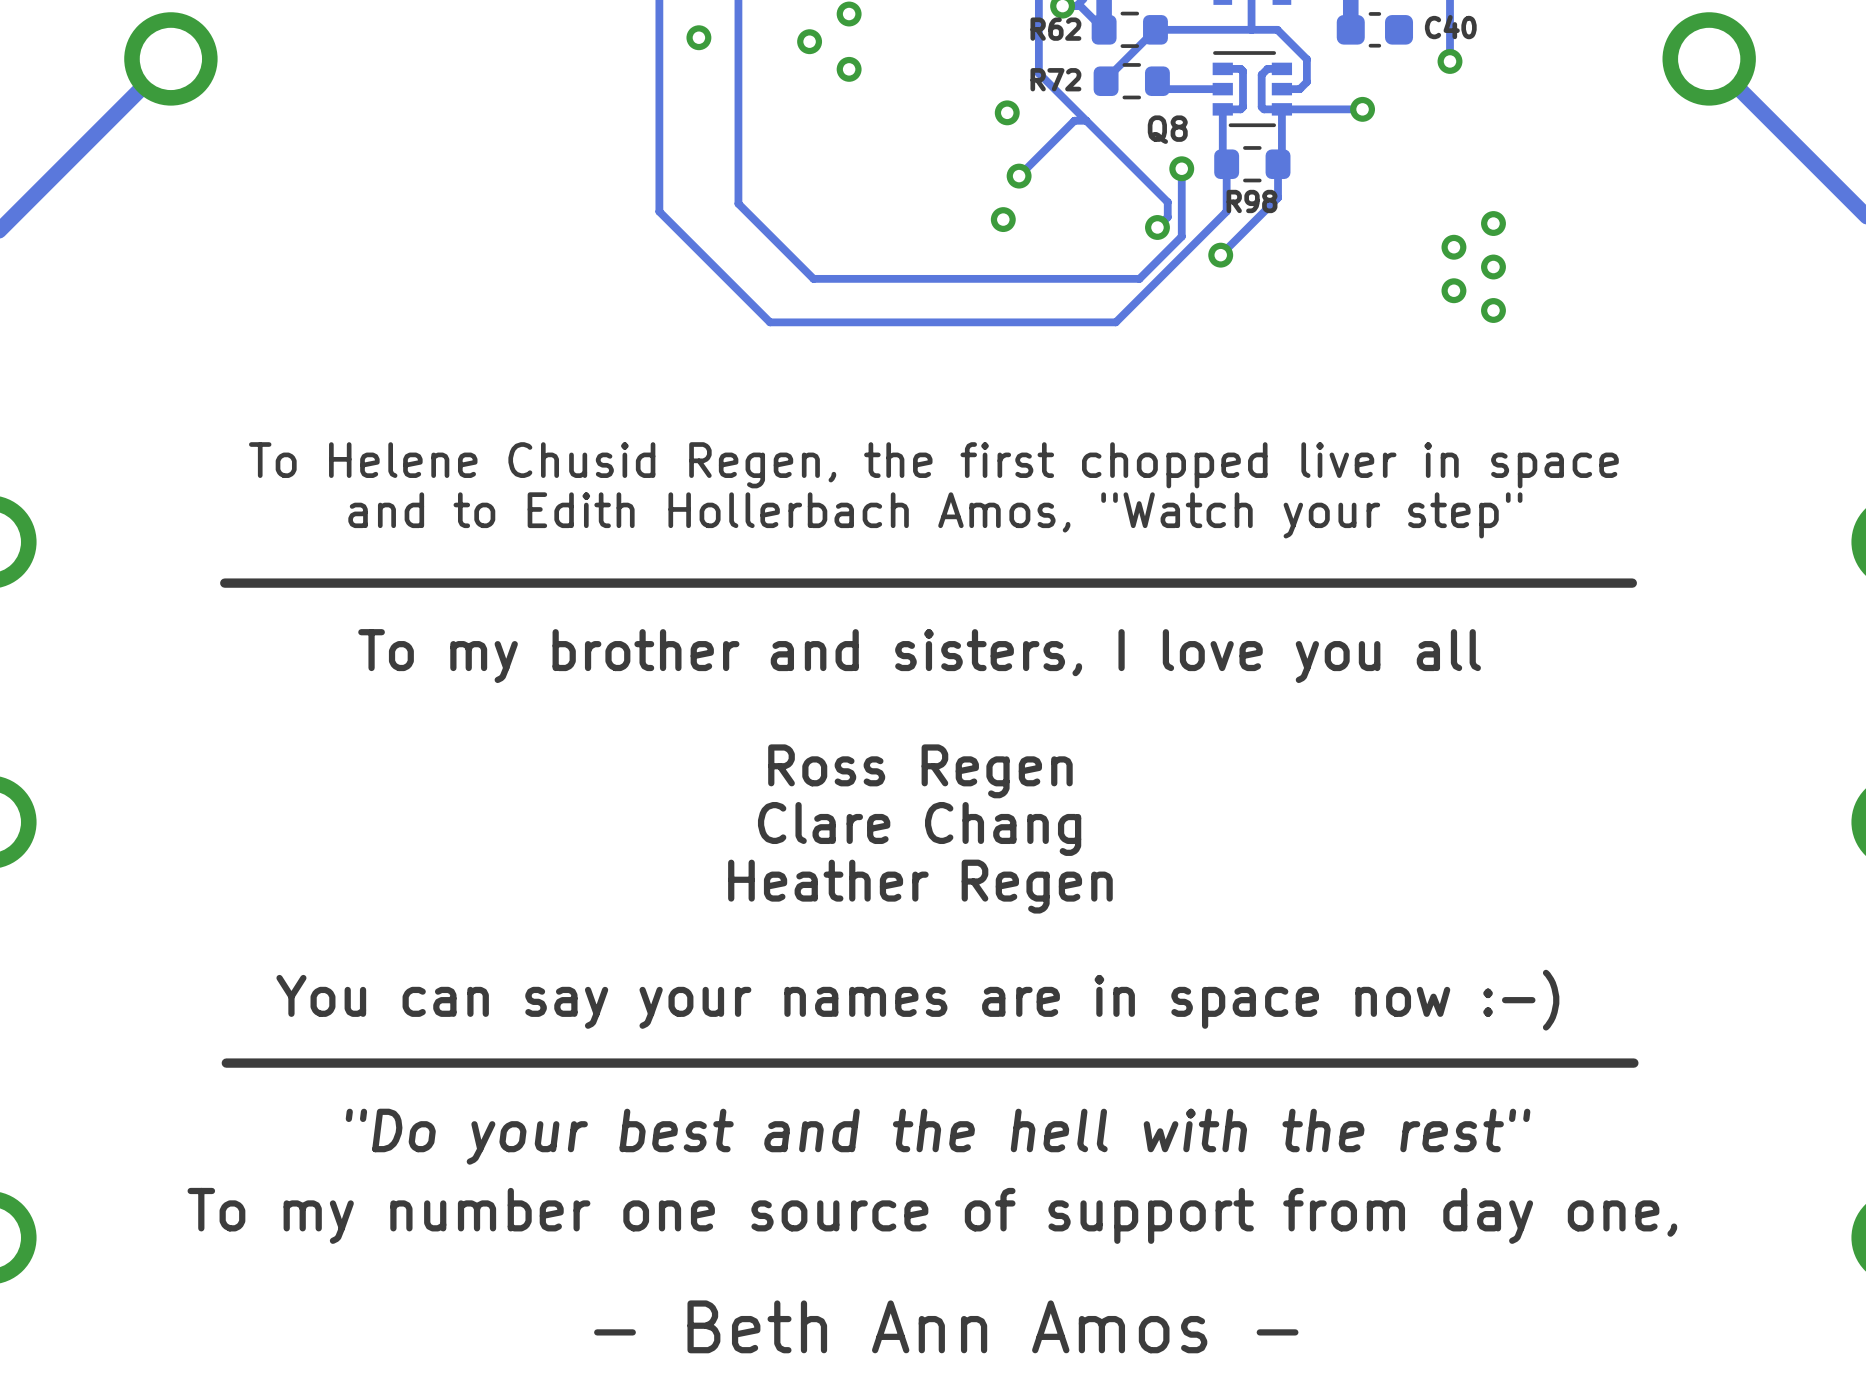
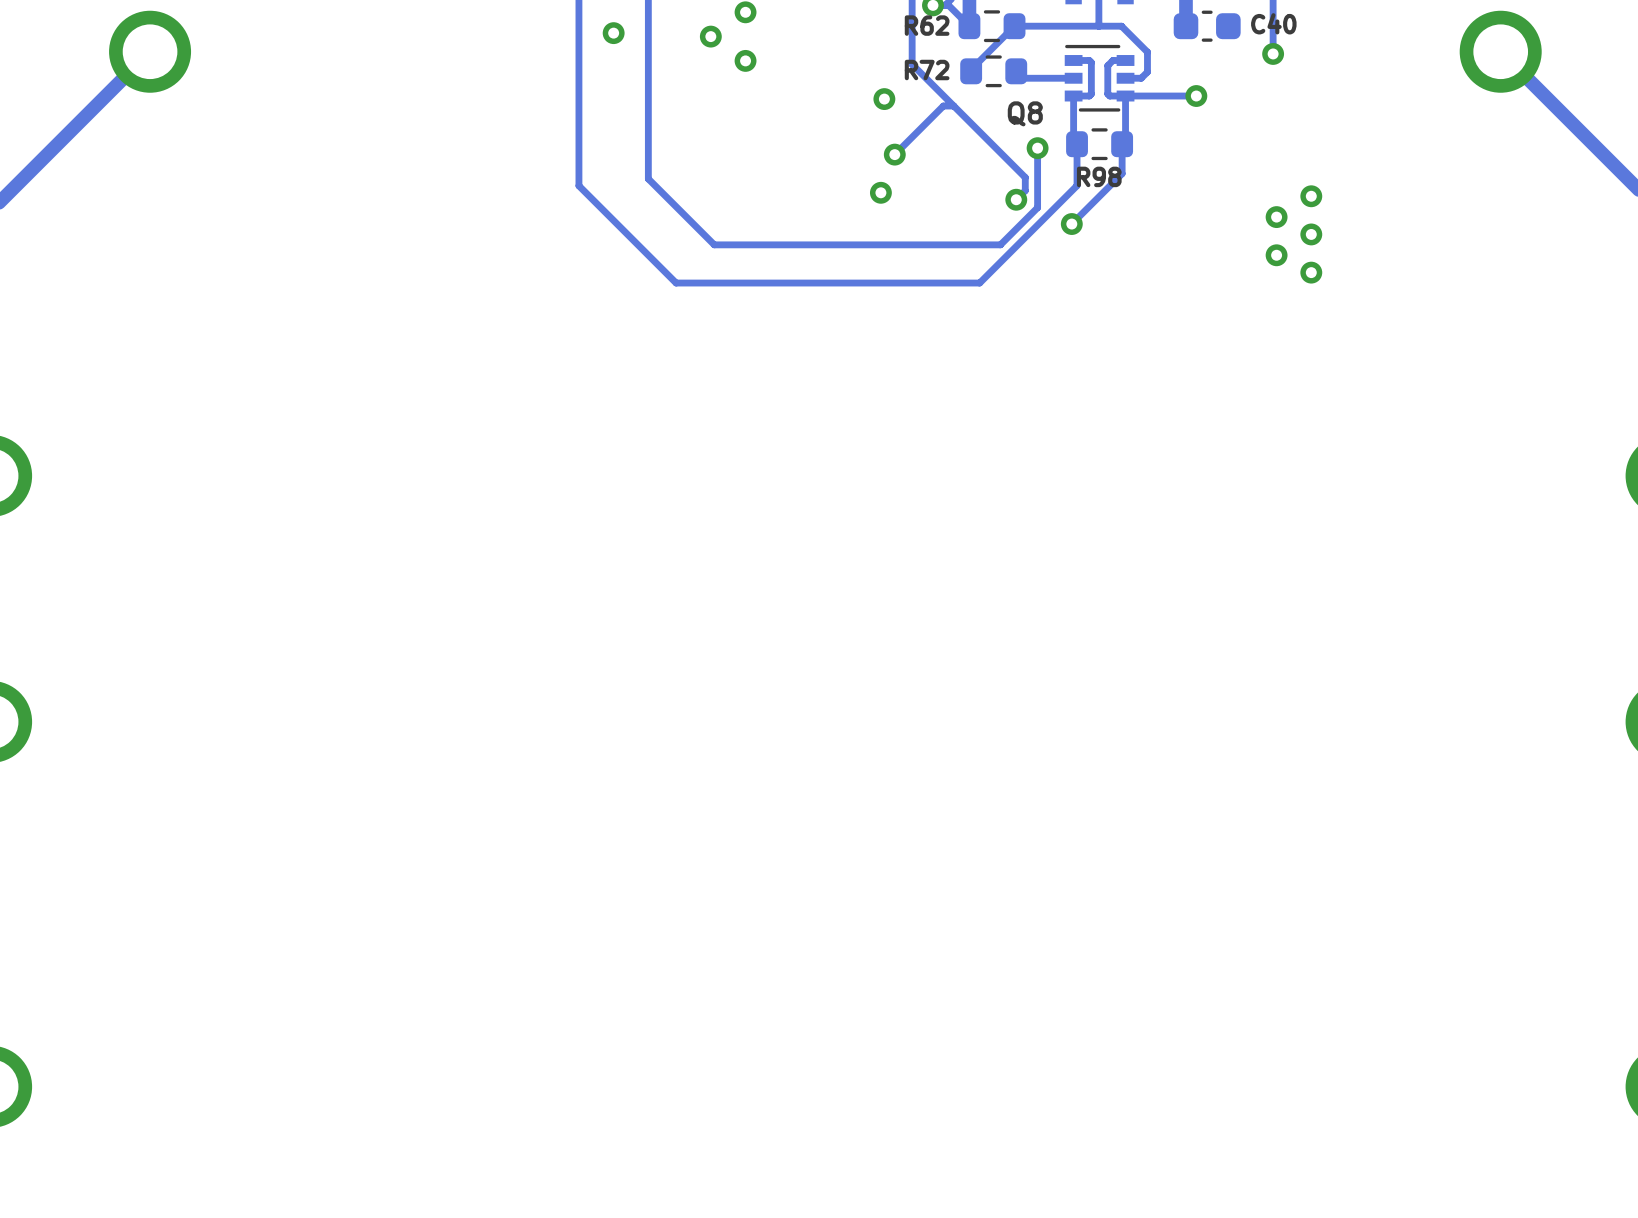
text: To Helene Chusid Regen, the first chopped liver in space (933, 465) -> none
text: and to Edith Hollerbach Amos, "Watch your step" (935, 515) -> none
line: (1632, 583) (224, 583) -> none
text: To my brother and sisters, I love you all (919, 656) -> none
text: Ross Regen (920, 771) -> none
text: Clare Chang (919, 828) -> none
text: Heather Regen (920, 886) -> none
text: You can say your names are in space now :-) (917, 1000) -> none
line: (1633, 1063) (226, 1063) -> none
text: "Do your best and the hell with the rest" (938, 1136) -> none
text: To my number one source of support from day one, (932, 1215) -> none
text: - Beth Ann Amos - (946, 1326) -> none

